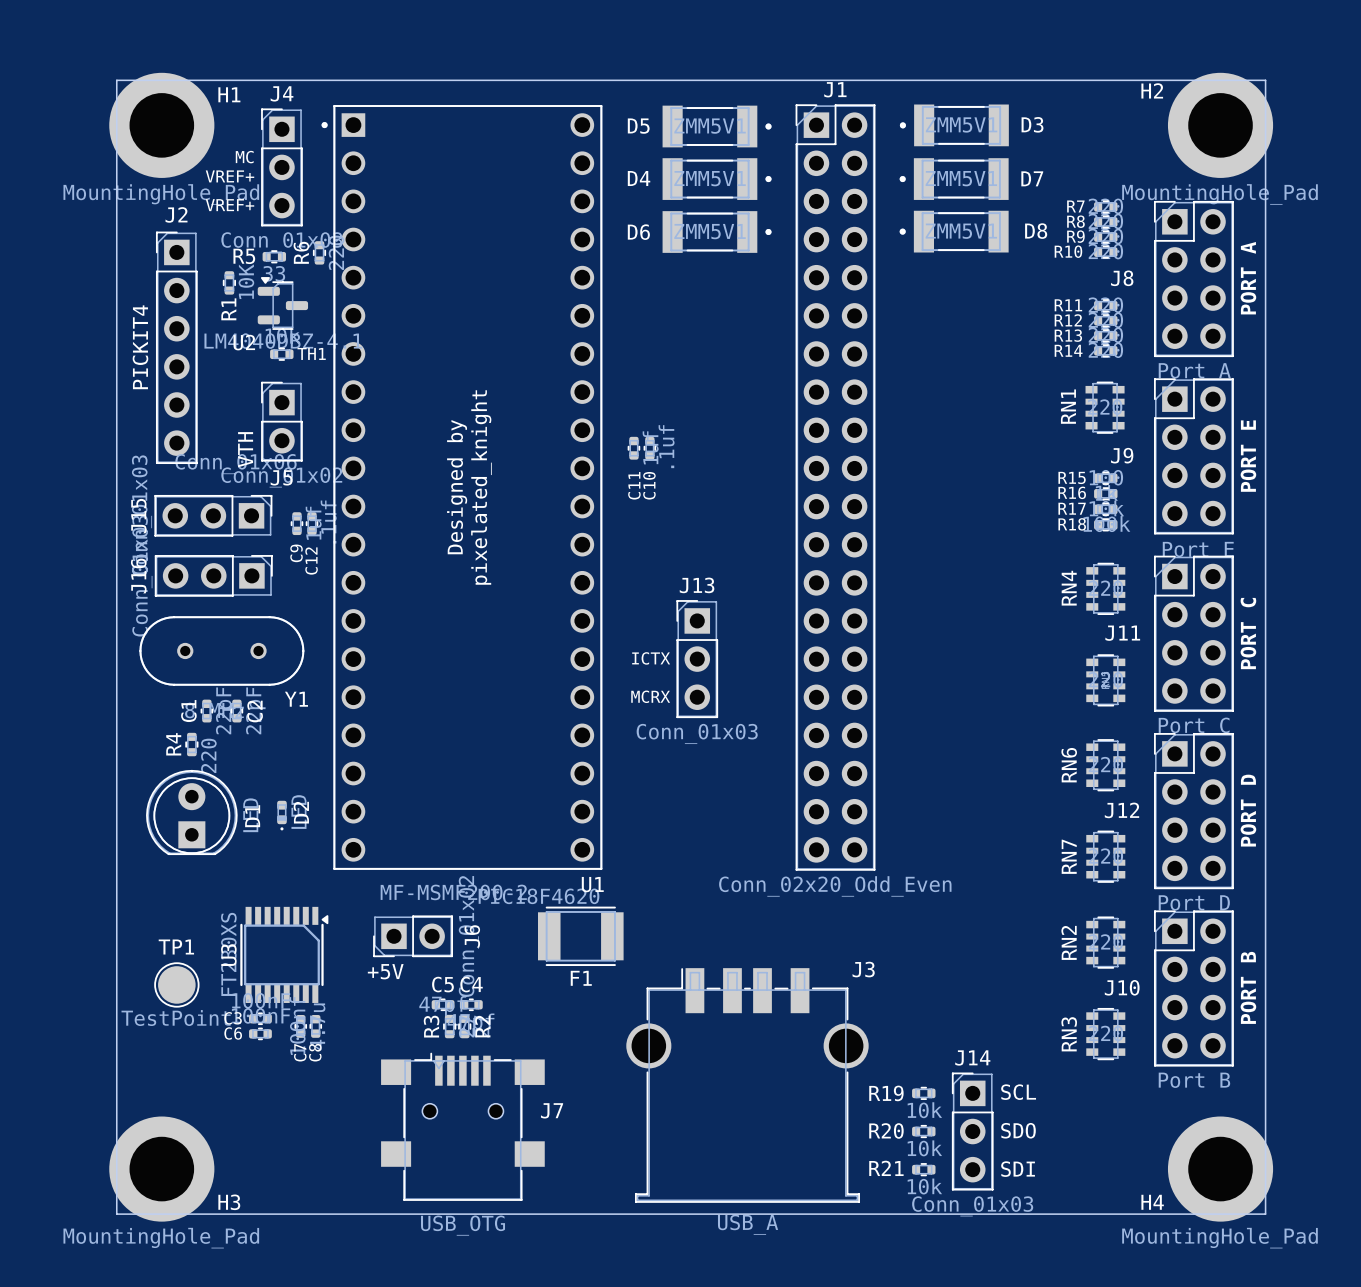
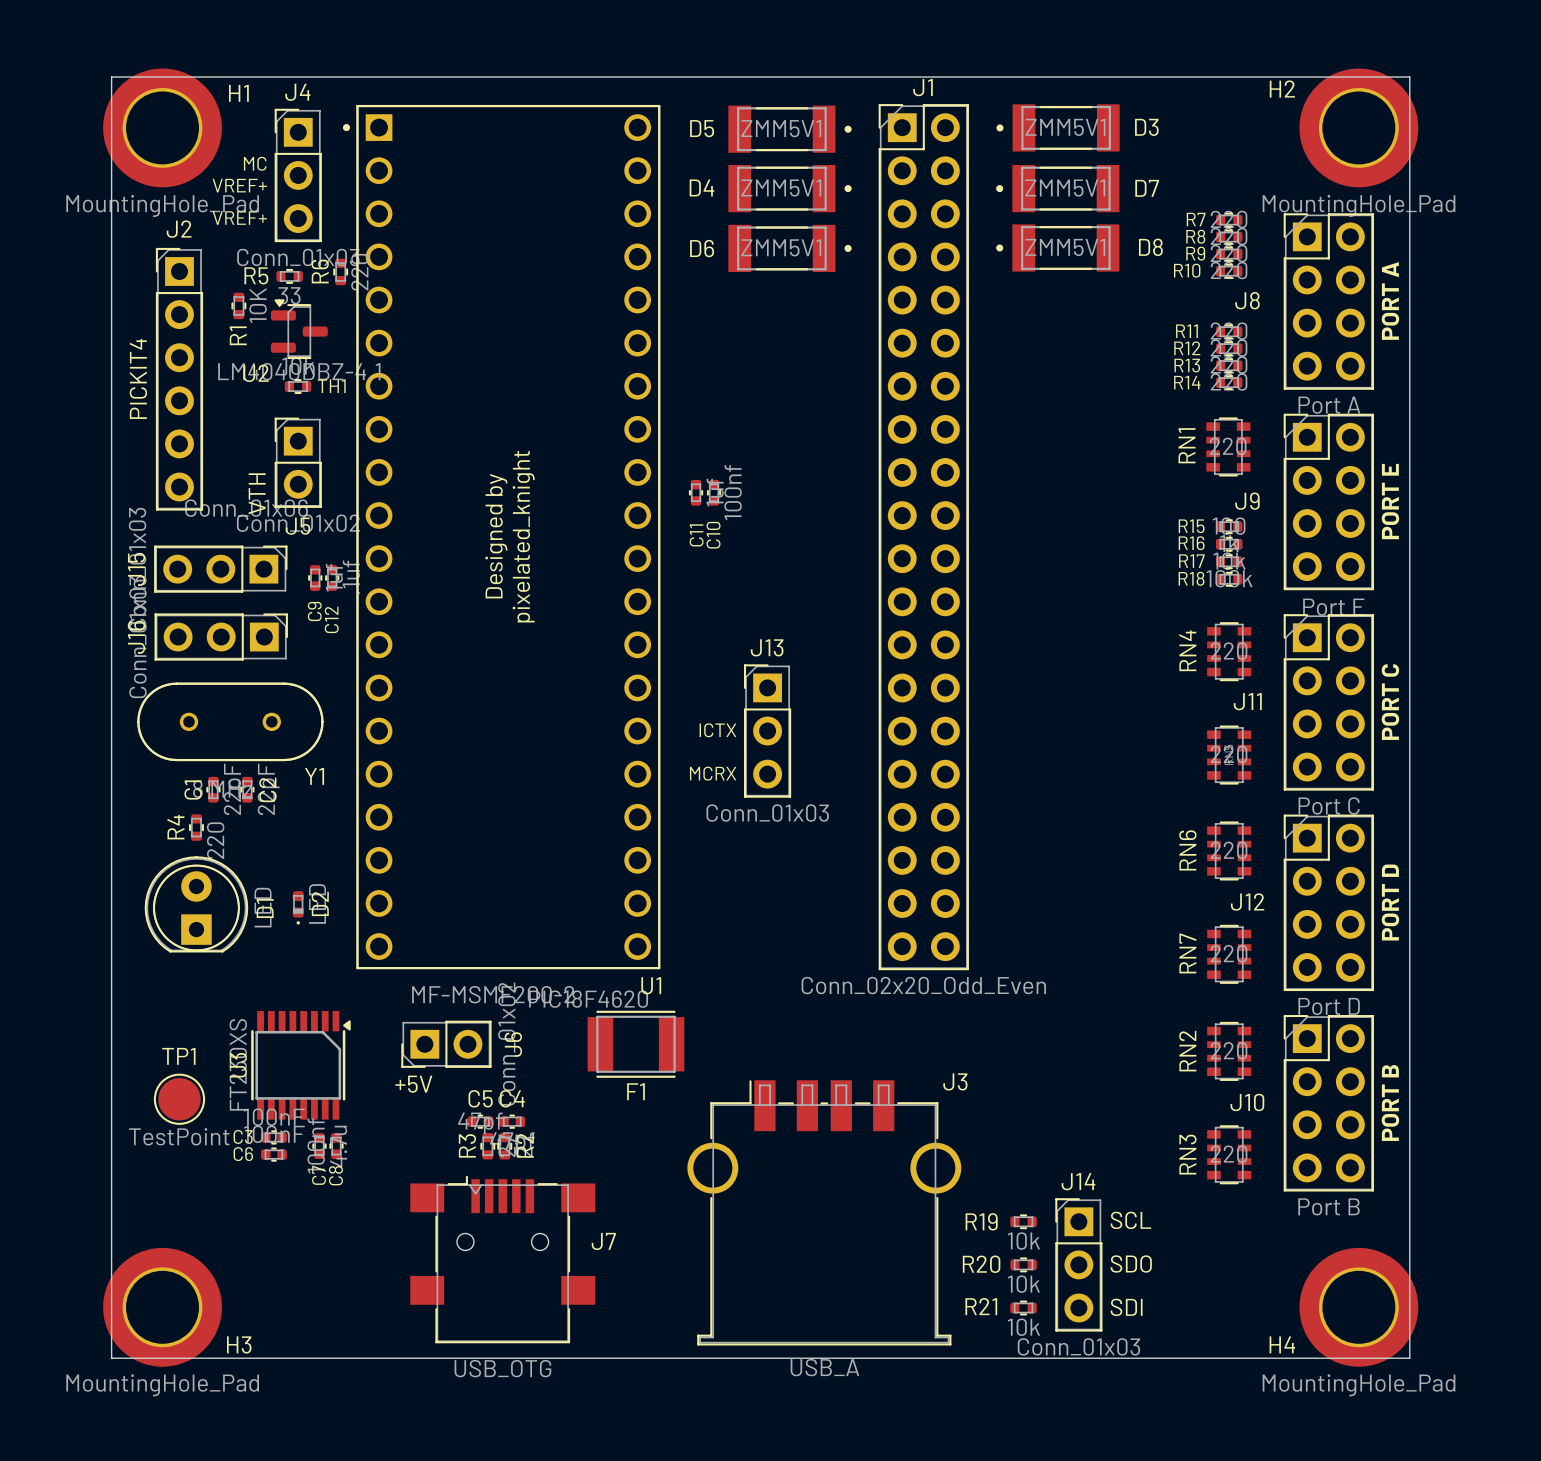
C10 value: .1uf (666, 446) -> 100nf (733, 492)

